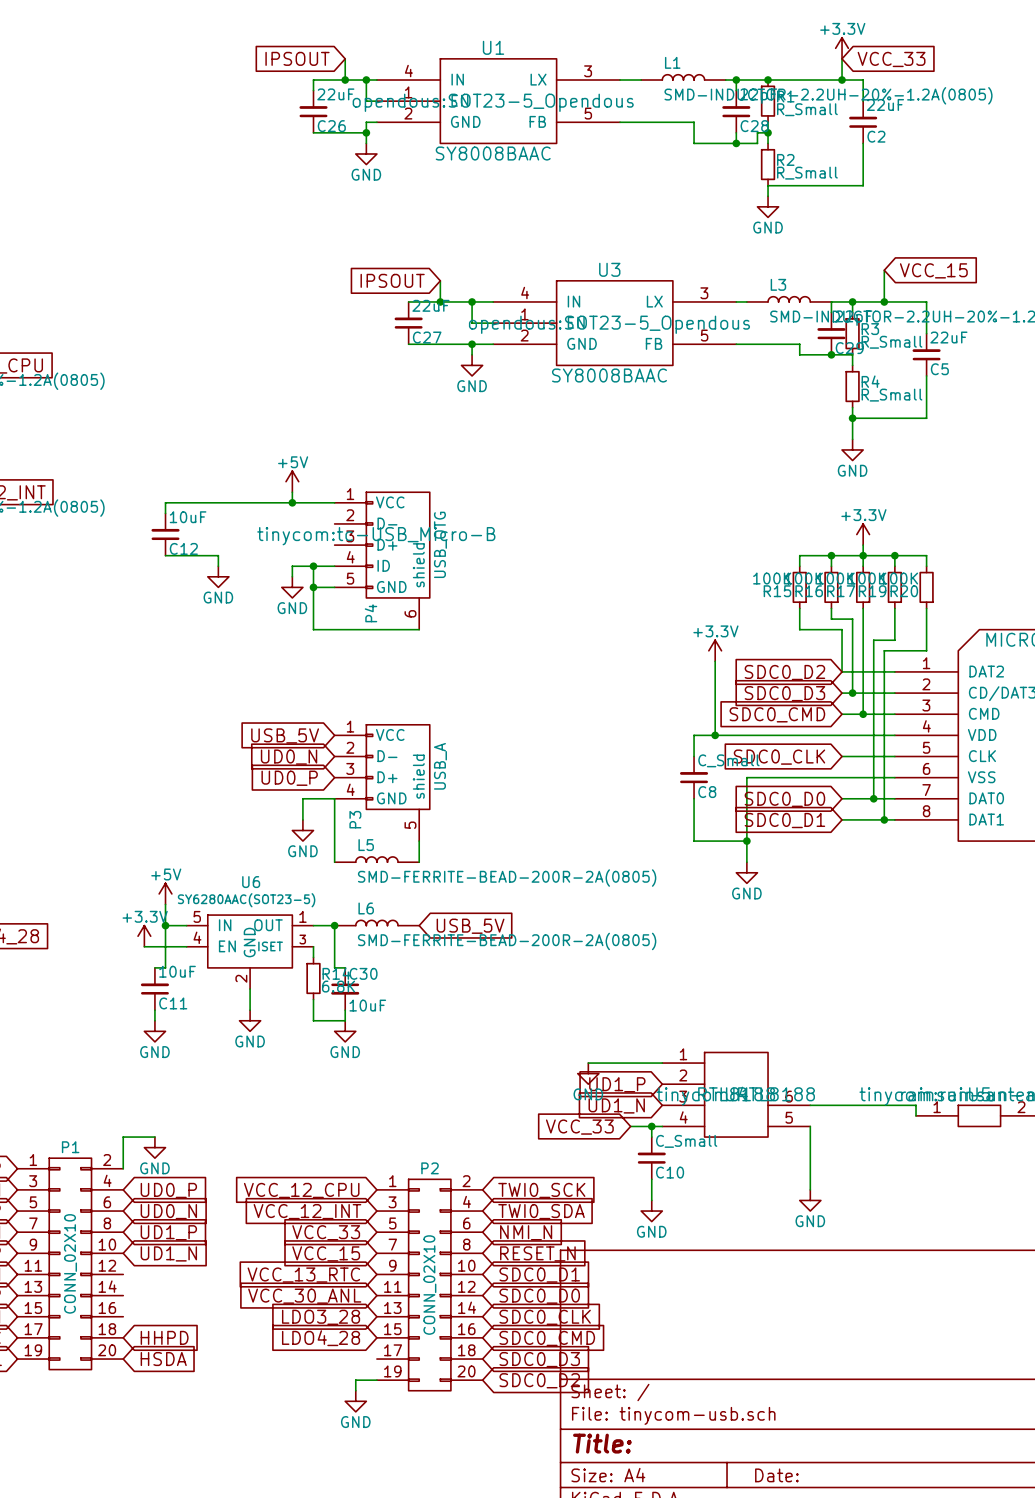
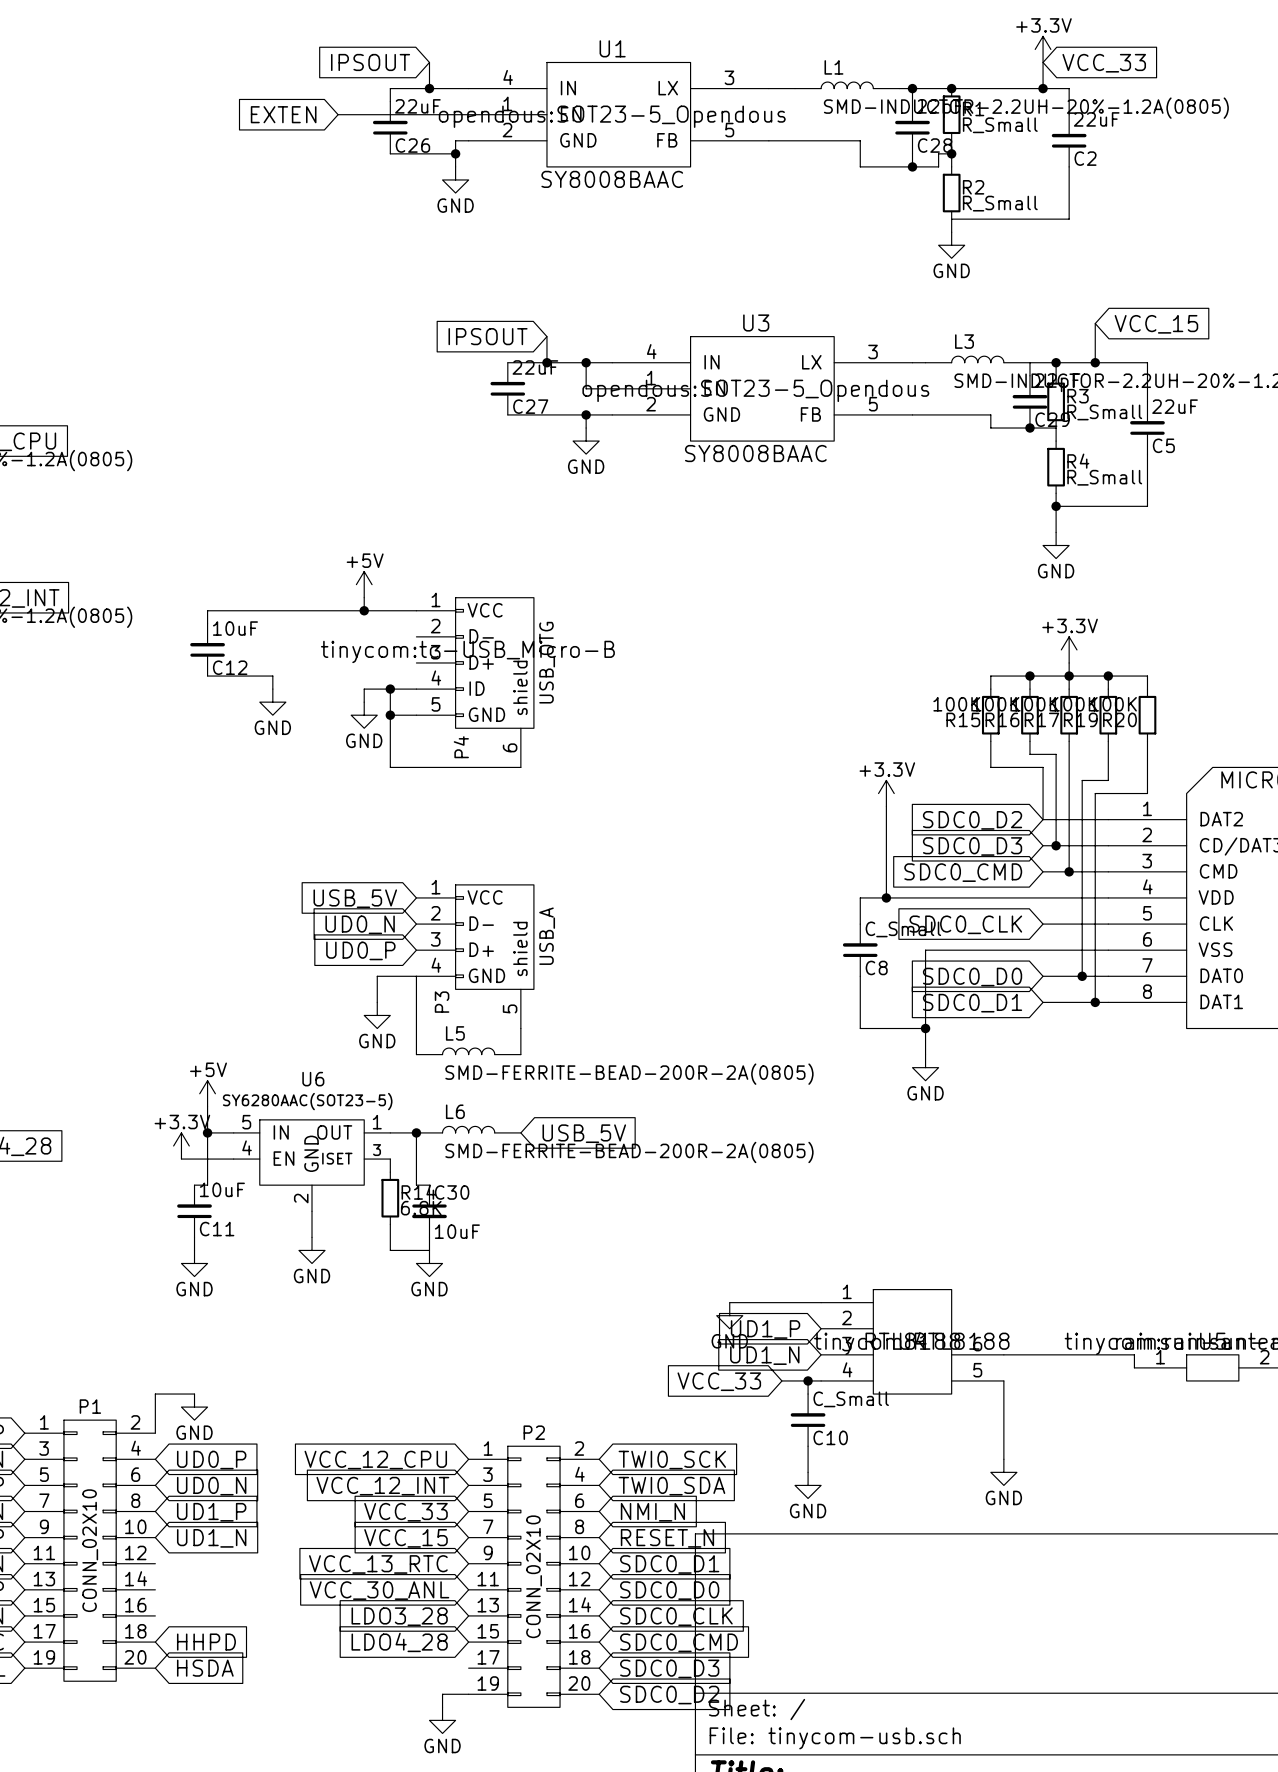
wire: (366, 80) (366, 101) -> (338, 114) (455, 114)
junction: (366, 80) -> none
global label: none -> EXTEN (283, 114)

